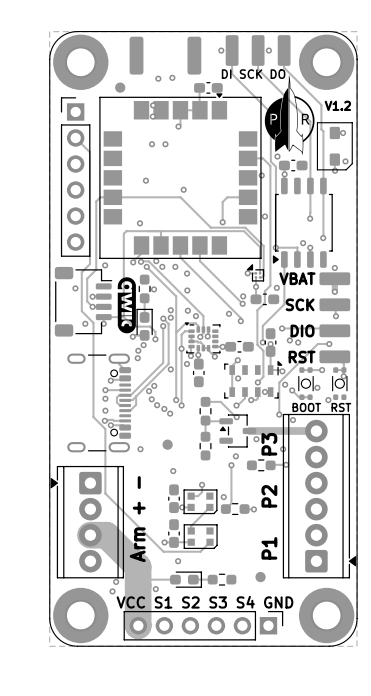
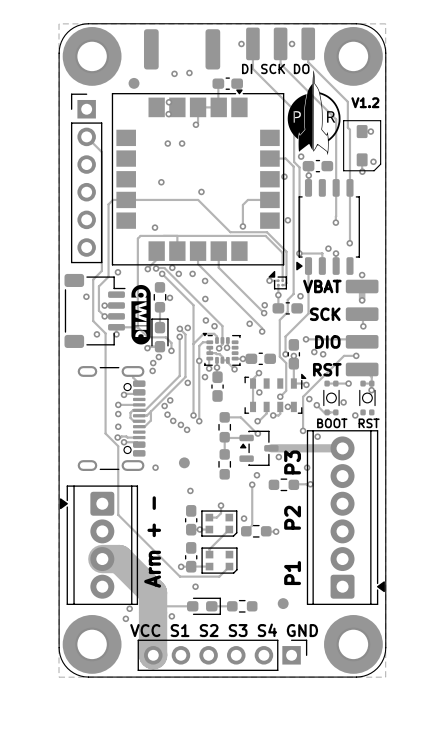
via: (170, 310) -> none

